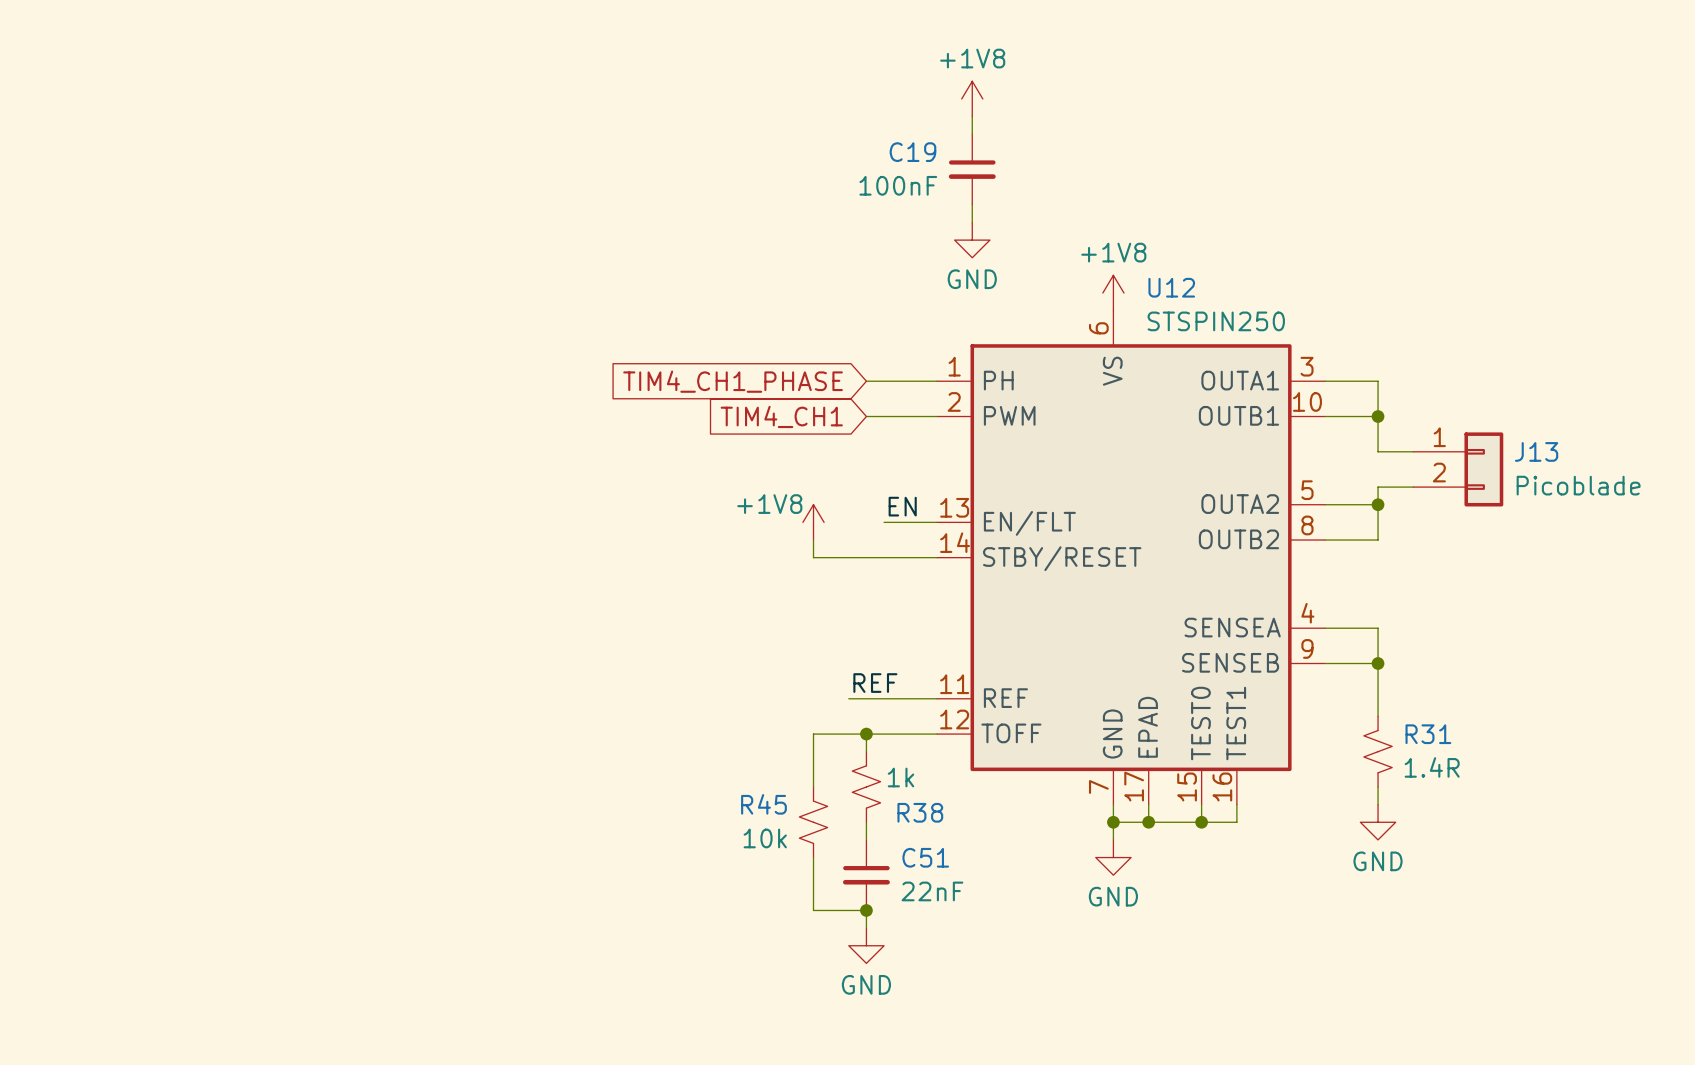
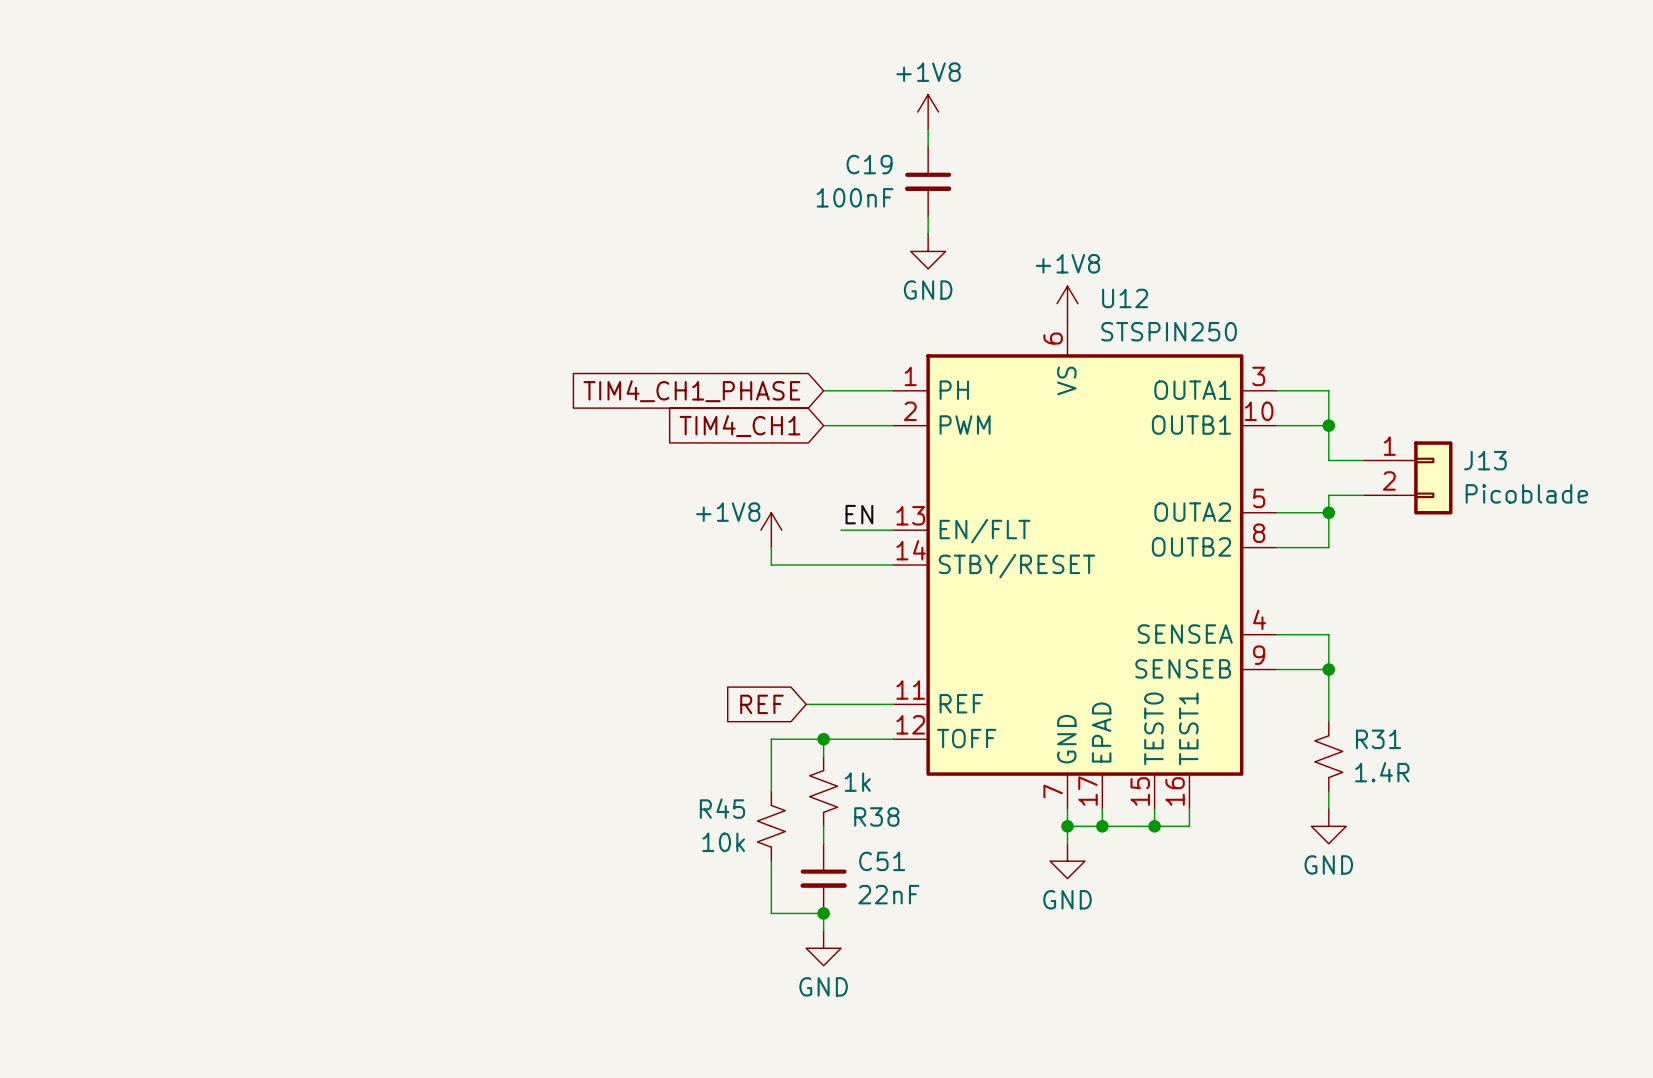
label: REF (875, 683) -> none
global label: none -> REF (761, 704)

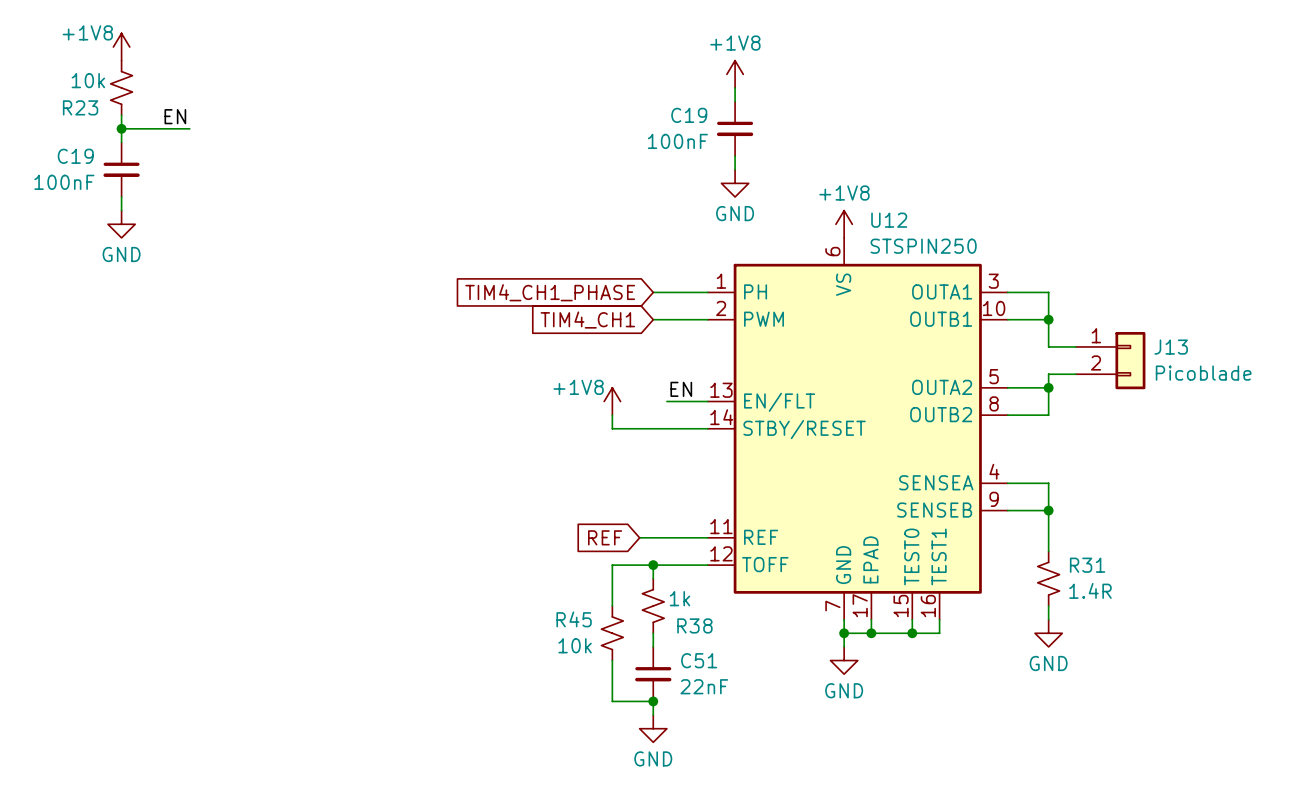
power symbol: none -> +1V8 (121, 47)
R23: none -> 10k (121, 87)
wire: none -> (121, 115) (121, 142)
label: none -> EN (175, 116)
wire: none -> (121, 128) (189, 128)
junction: none -> (121, 128)
C19: none -> 100nF (121, 169)
wire: none -> (121, 197) (121, 210)
power symbol: none -> GND (121, 224)

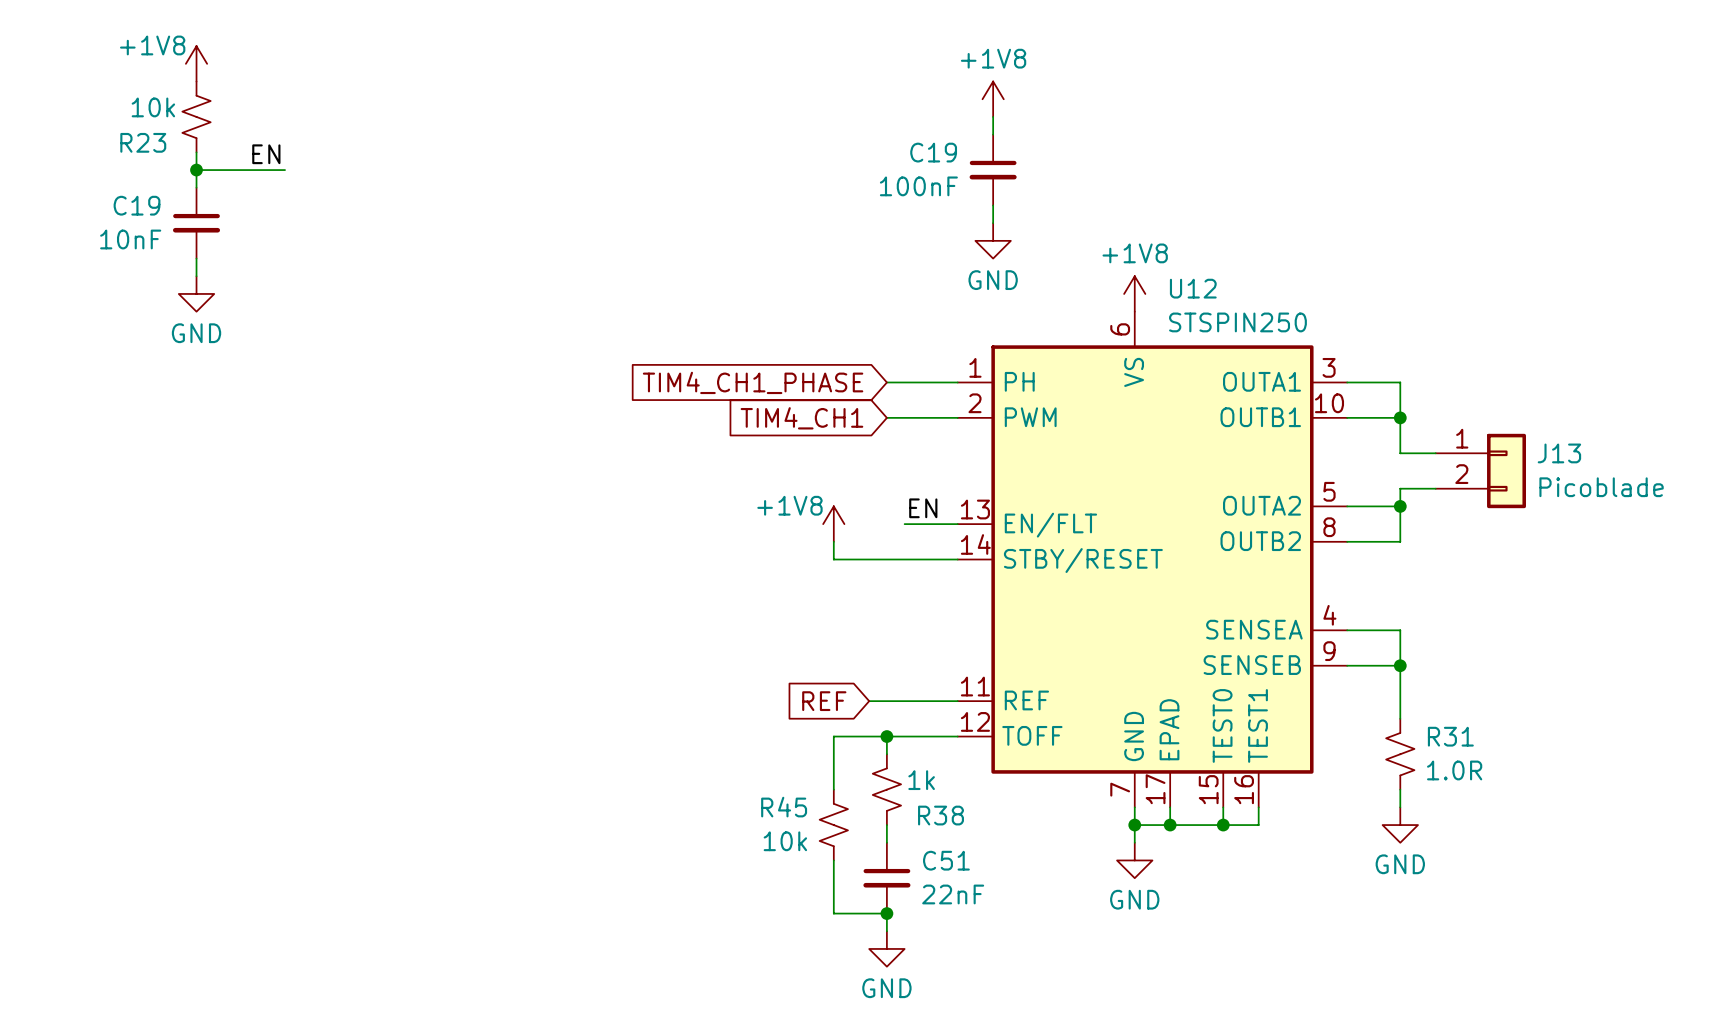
C19 value: 100nF (64, 182) -> 10nF (130, 239)
R31 value: 1.4R (1090, 590) -> 1.0R (1454, 770)

